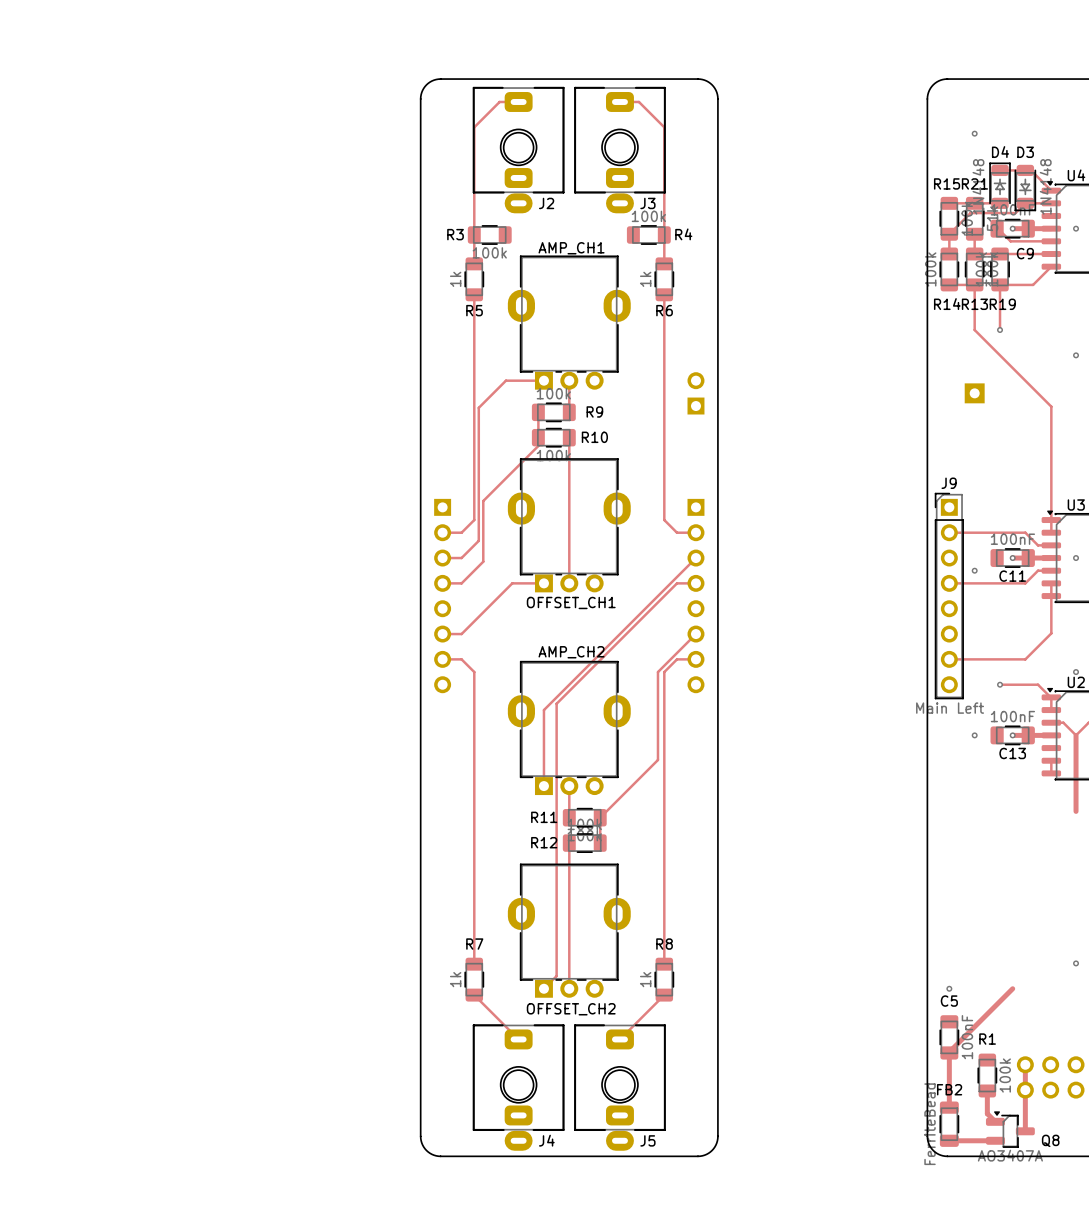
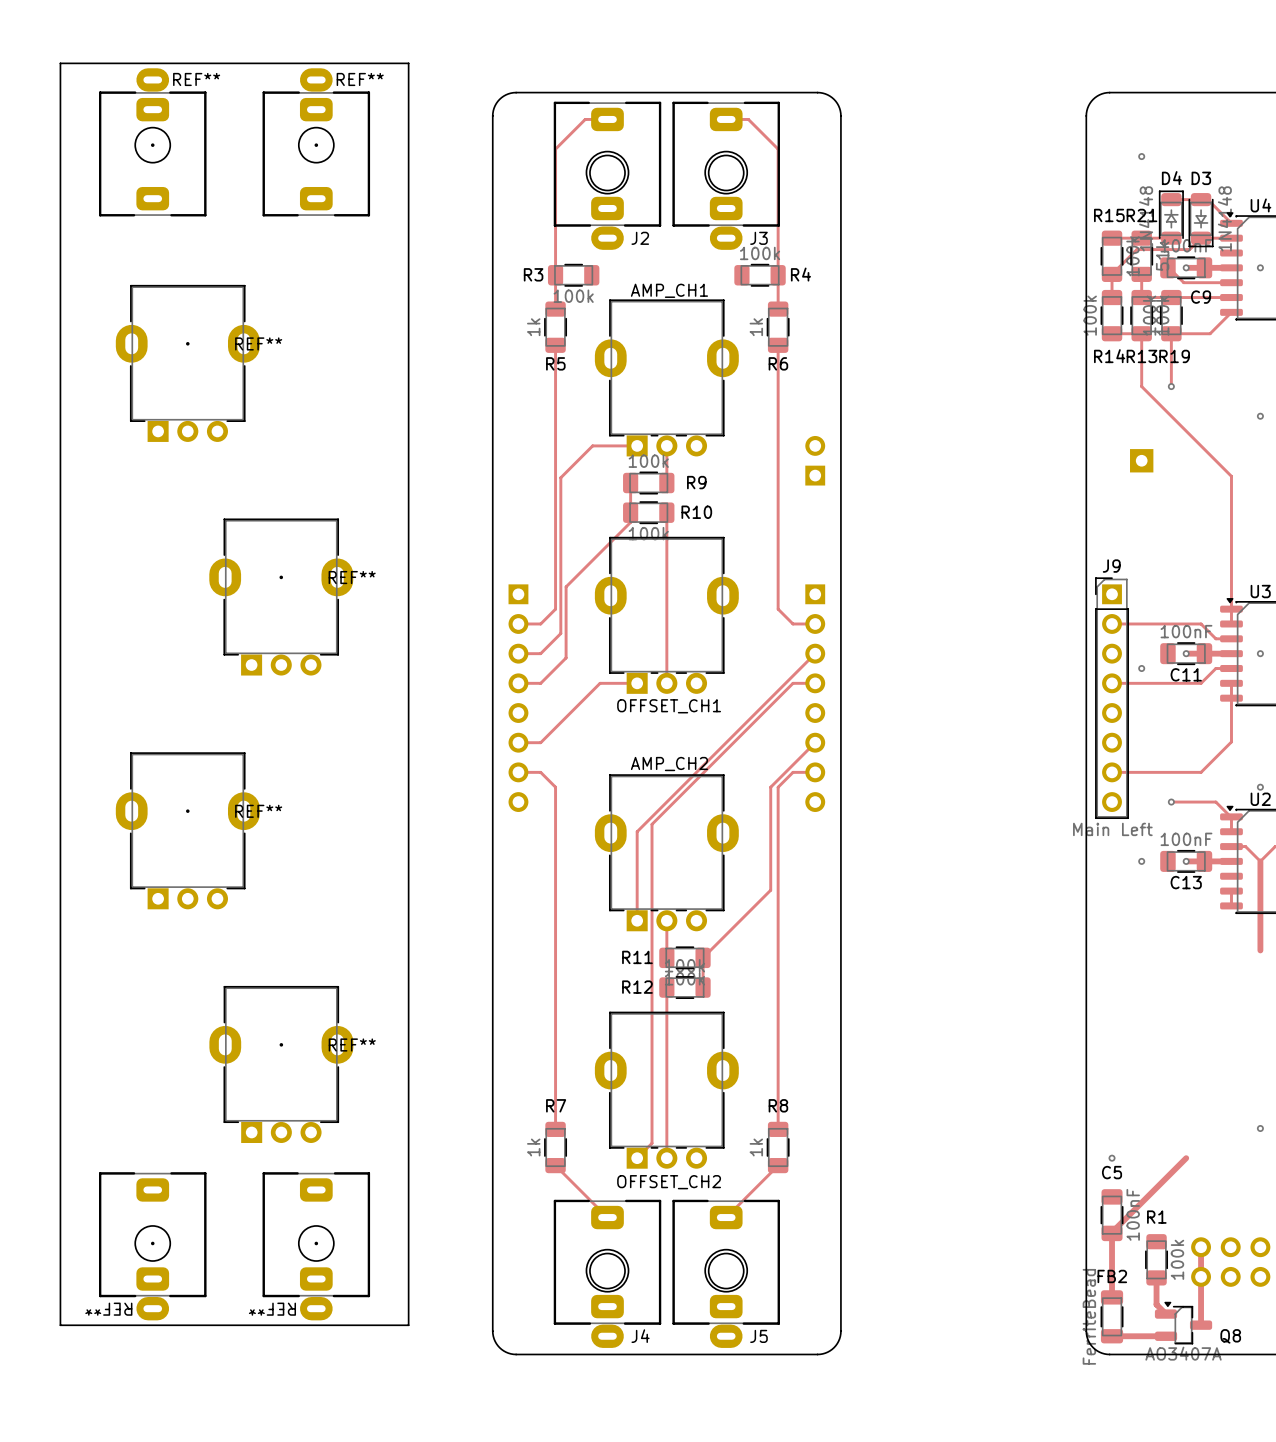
board edge: none -> (60, 63) (408, 63) (408, 1325) (60, 1325) (60, 63)
REF**: none -> (152, 142)
REF**: none -> (316, 142)
REF**: none -> (187, 363)
REF**: none -> (281, 597)
REF**: none -> (187, 830)
REF**: none -> (281, 1064)
REF**: none -> (152, 1246)
REF**: none -> (316, 1246)

